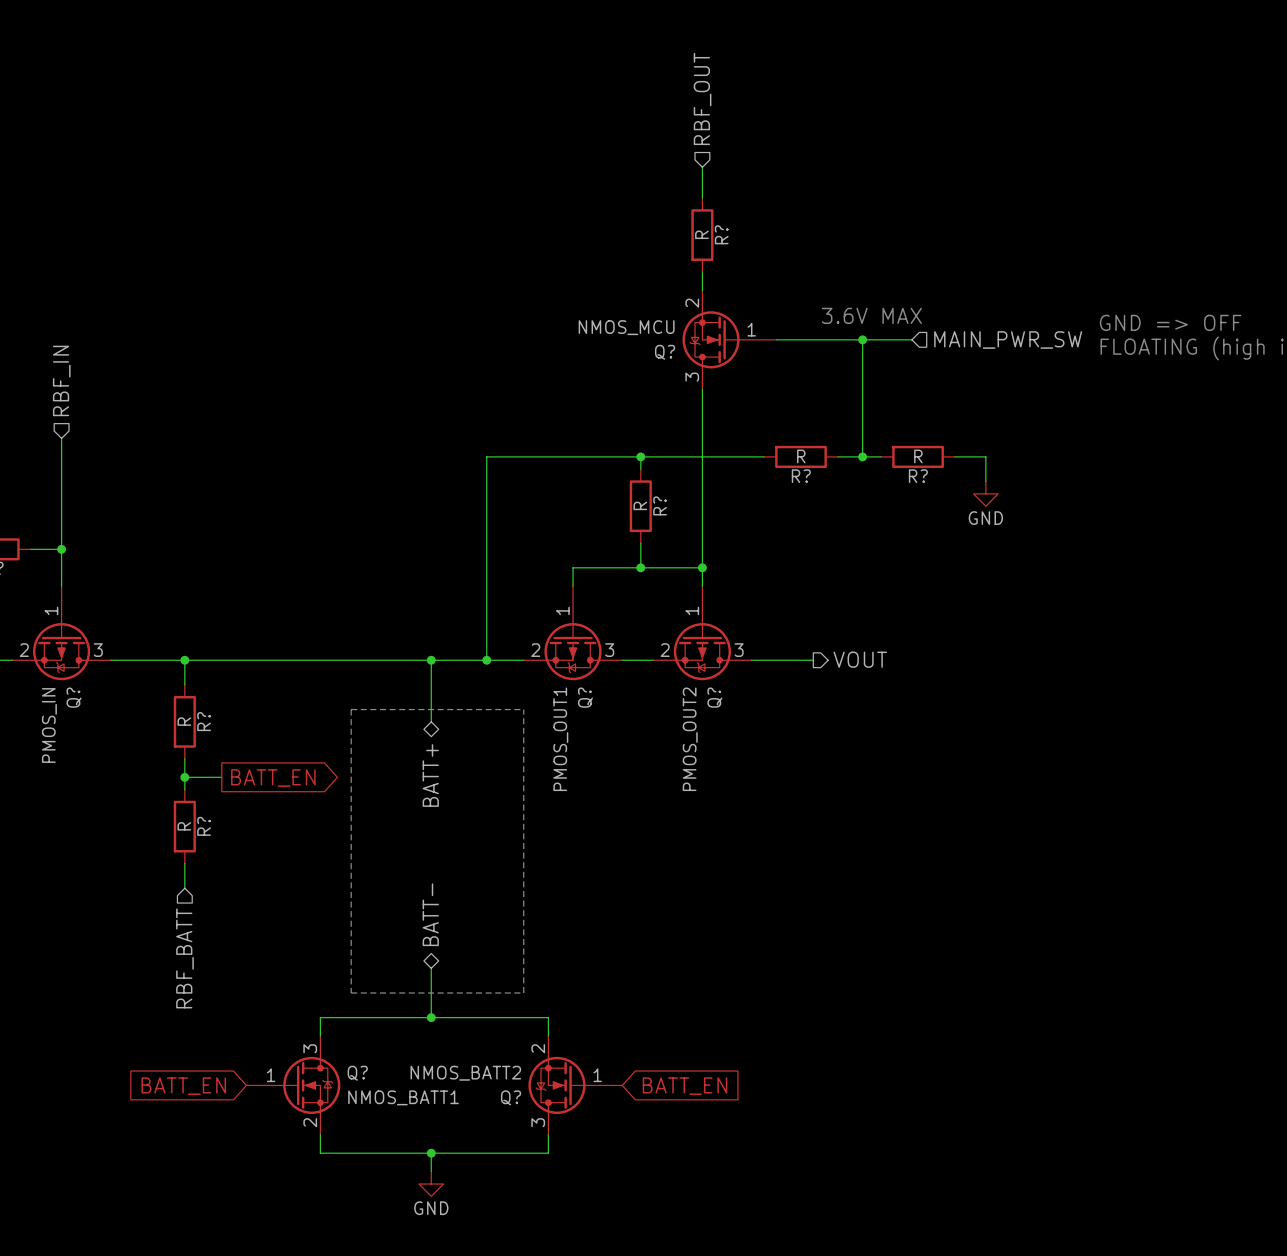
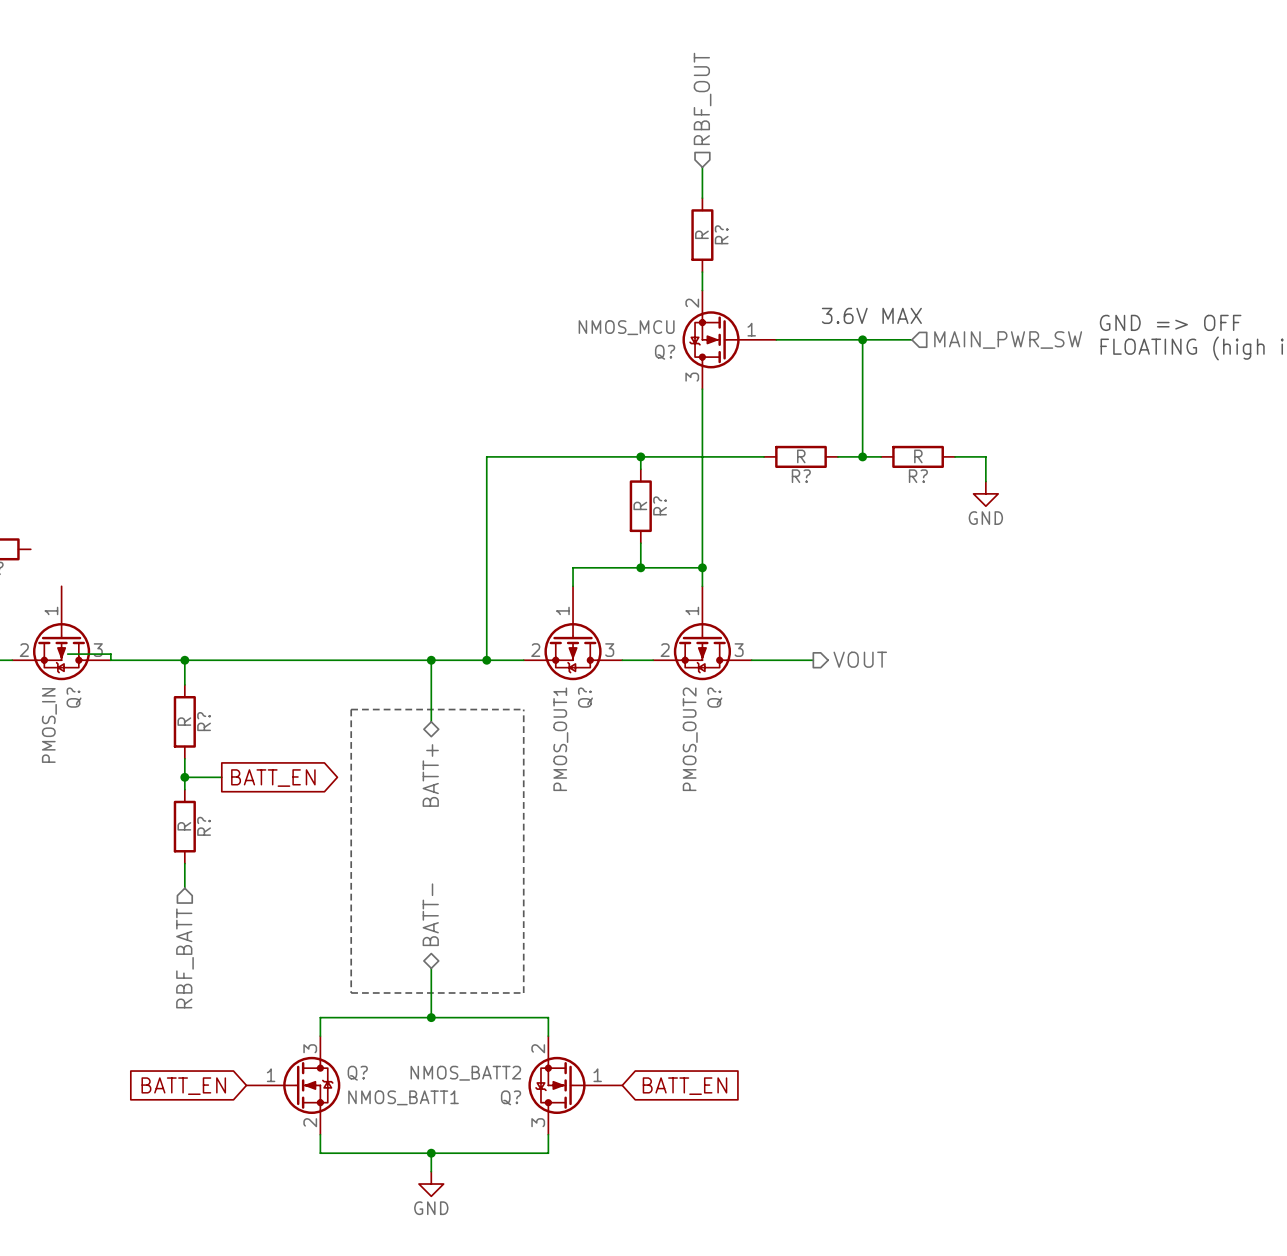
hierarchical label: RBF_IN (61, 380) -> none
wire: (61, 438) (61, 586) -> none
wire: (30, 549) (61, 549) -> none
junction: (61, 549) -> none
wire: none -> (67, 654) (110, 654) (110, 660)

